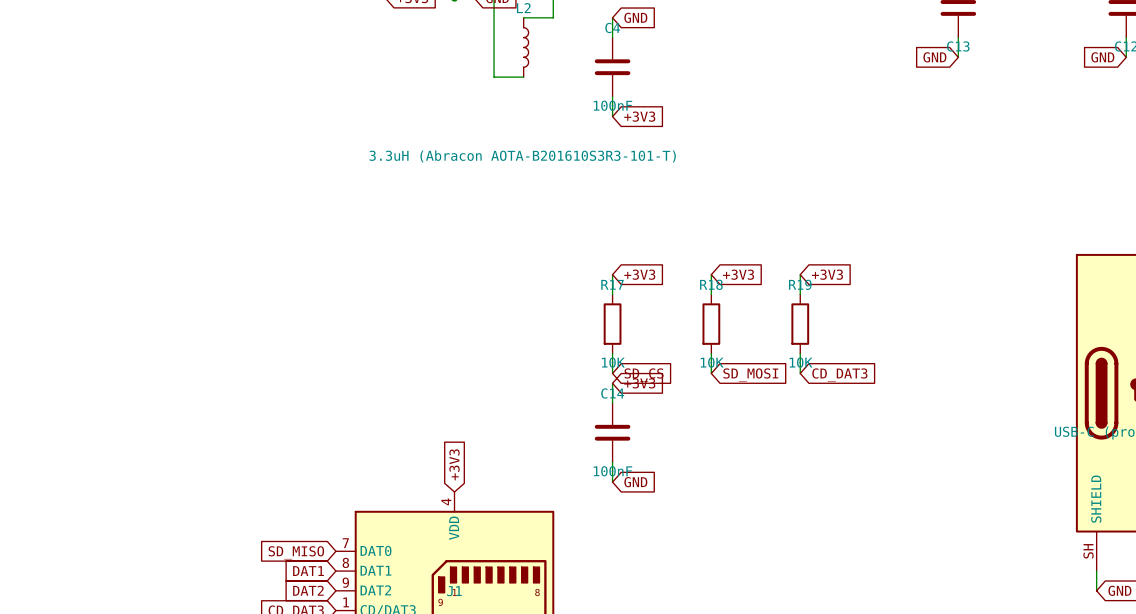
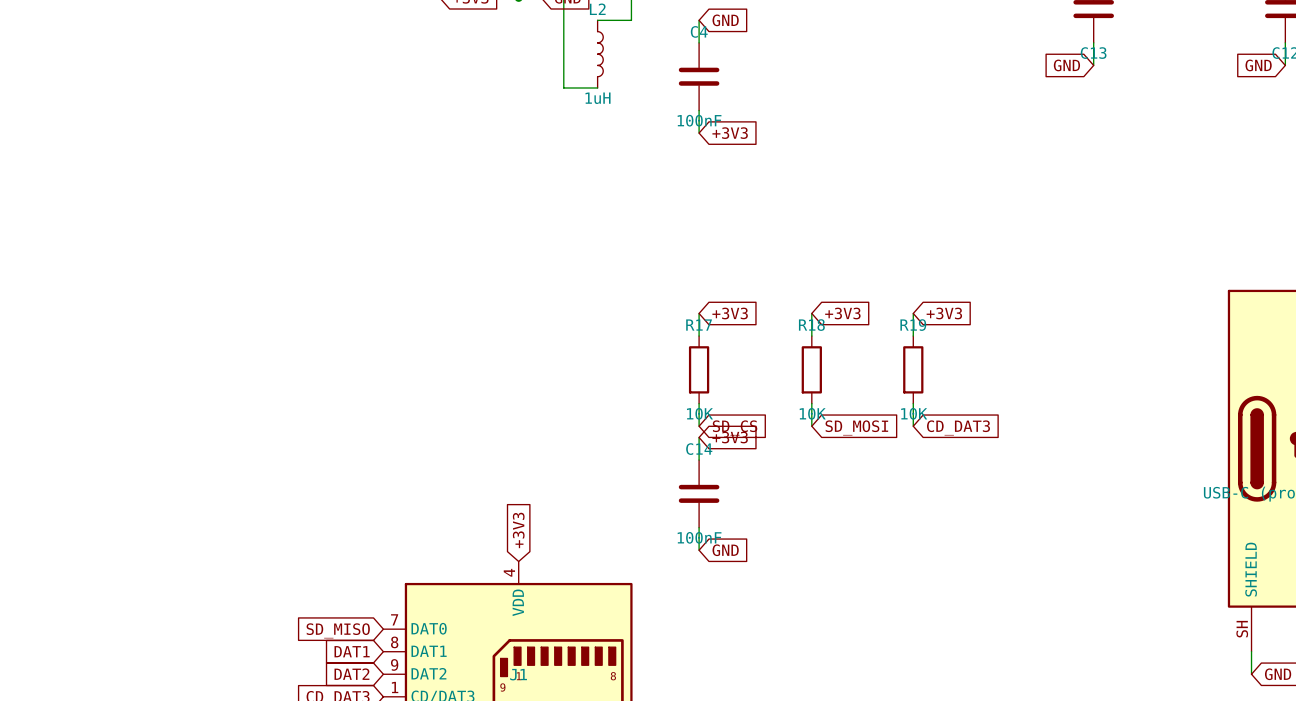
L2 value: 3.3uH (Abracon AOTA-B201610S3R3-101-T) (522, 156) -> 1uH (598, 98)

